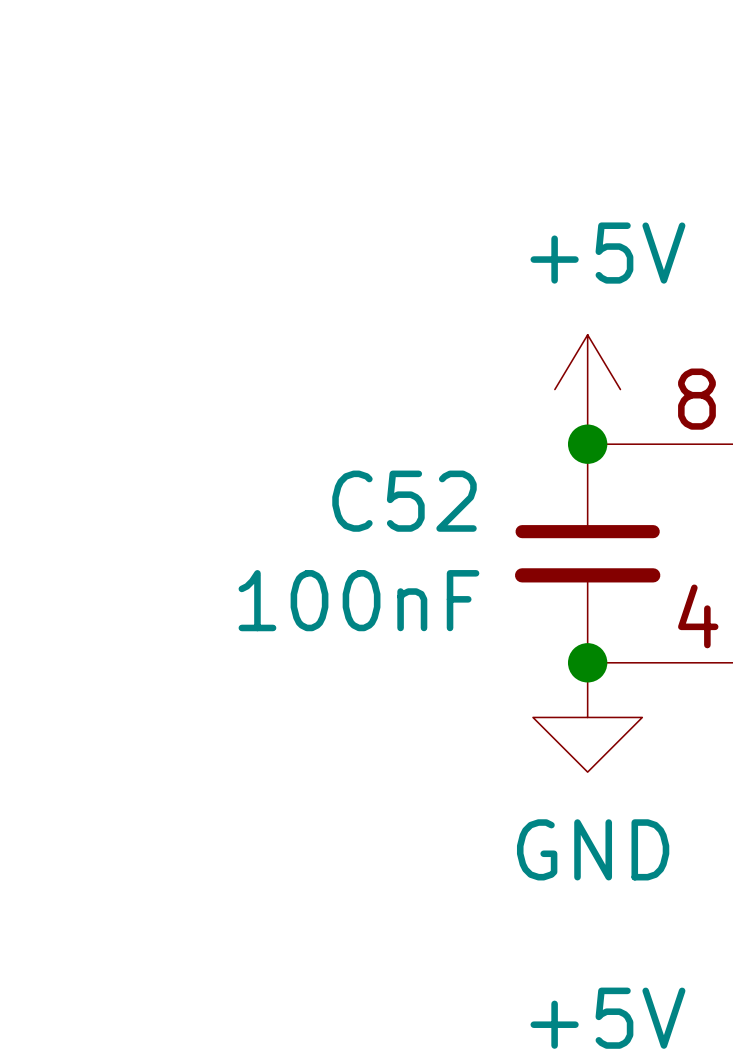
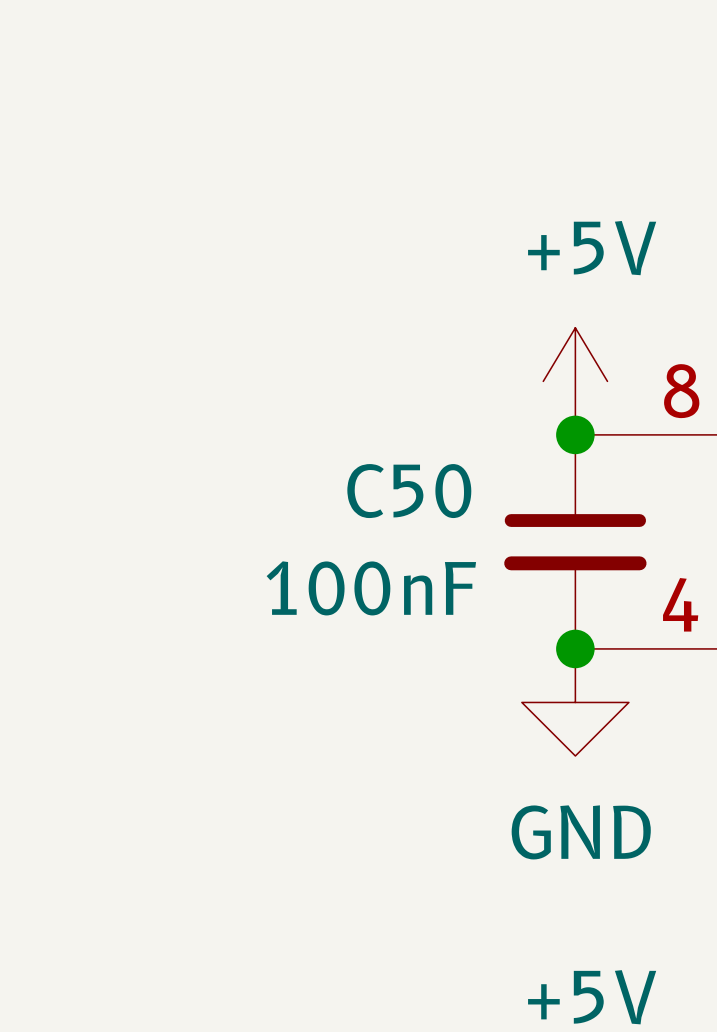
C52 name: C52 (404, 501) -> C50 (409, 491)

